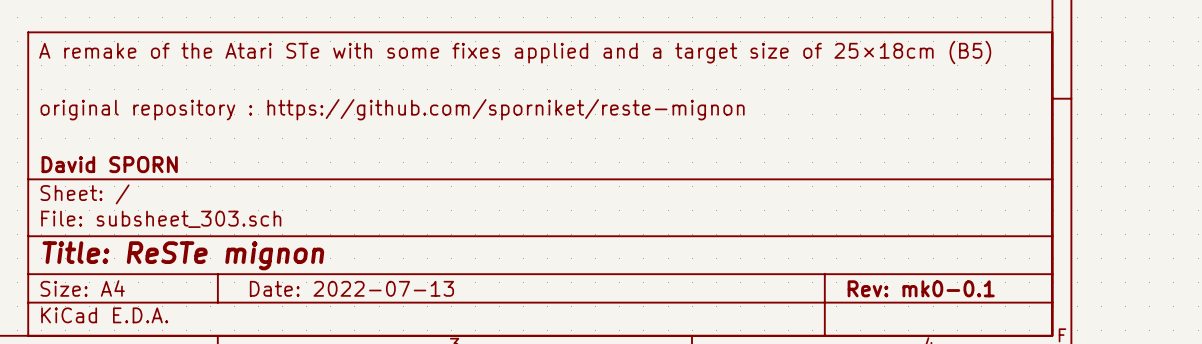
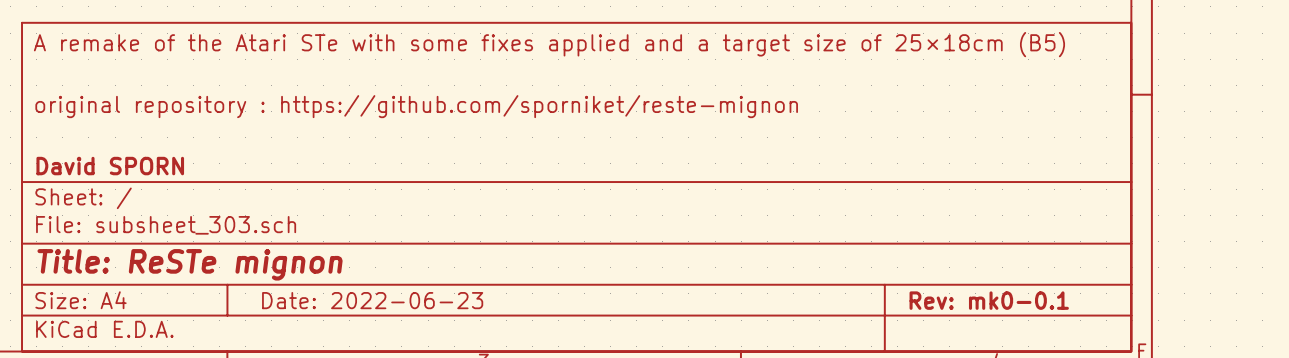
title block: Date: 2022-07-13 (351, 288) -> Date: 2022-06-23 (372, 300)

